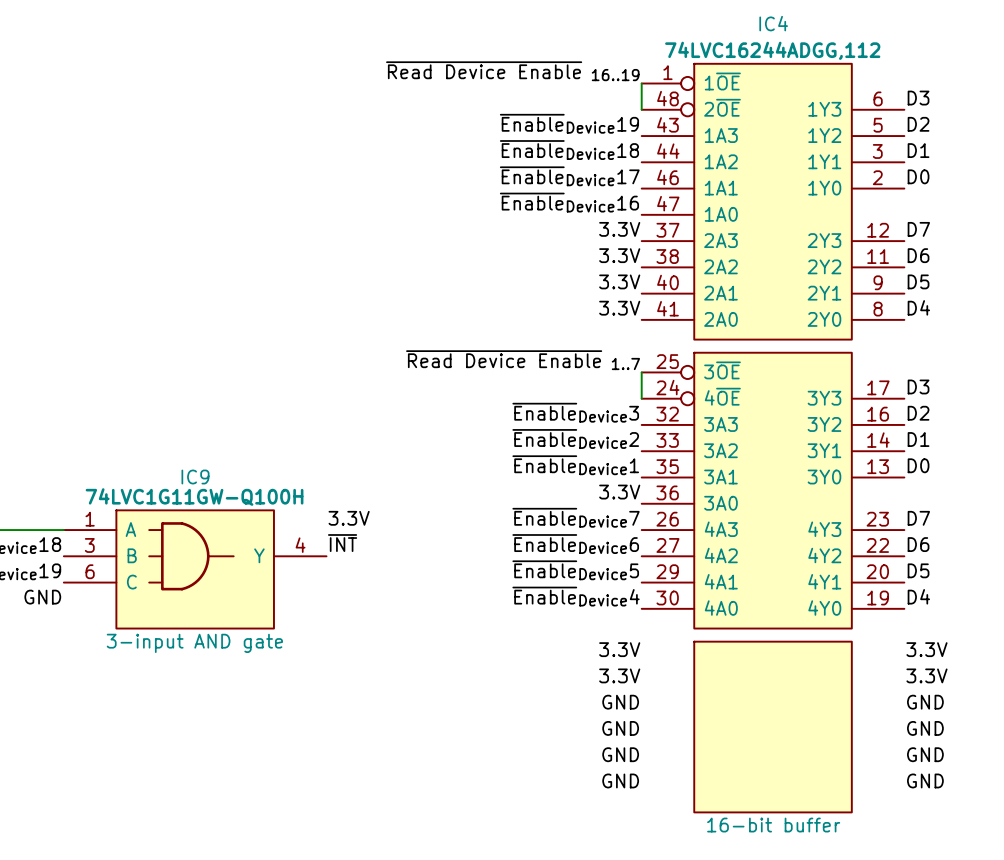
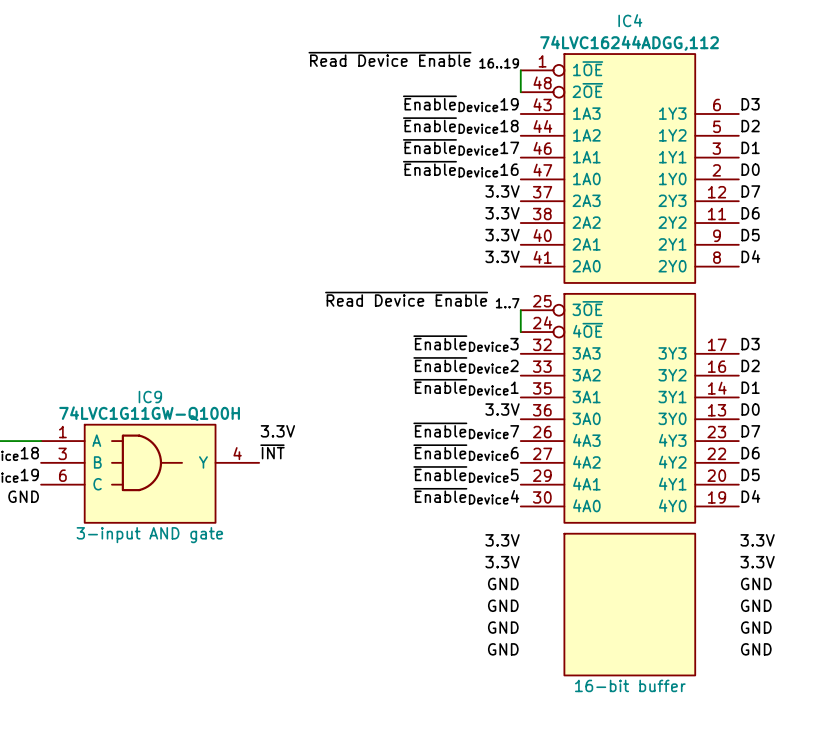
IC4 symbol: [641, 63, 905, 814] -> [520, 53, 739, 677]
label: D3 (918, 98) -> none
label: D2 (918, 124) -> D3 (750, 104)
label: D1 (918, 150) -> D2 (750, 126)
label: D0 (918, 176) -> D1 (750, 147)
label: none -> D0 (750, 169)
label: D3 (918, 386) -> none
label: D2 (918, 413) -> D3 (750, 344)
label: D1 (918, 439) -> D2 (750, 365)
label: D0 (918, 465) -> D1 (750, 387)
label: none -> D0 (750, 409)

